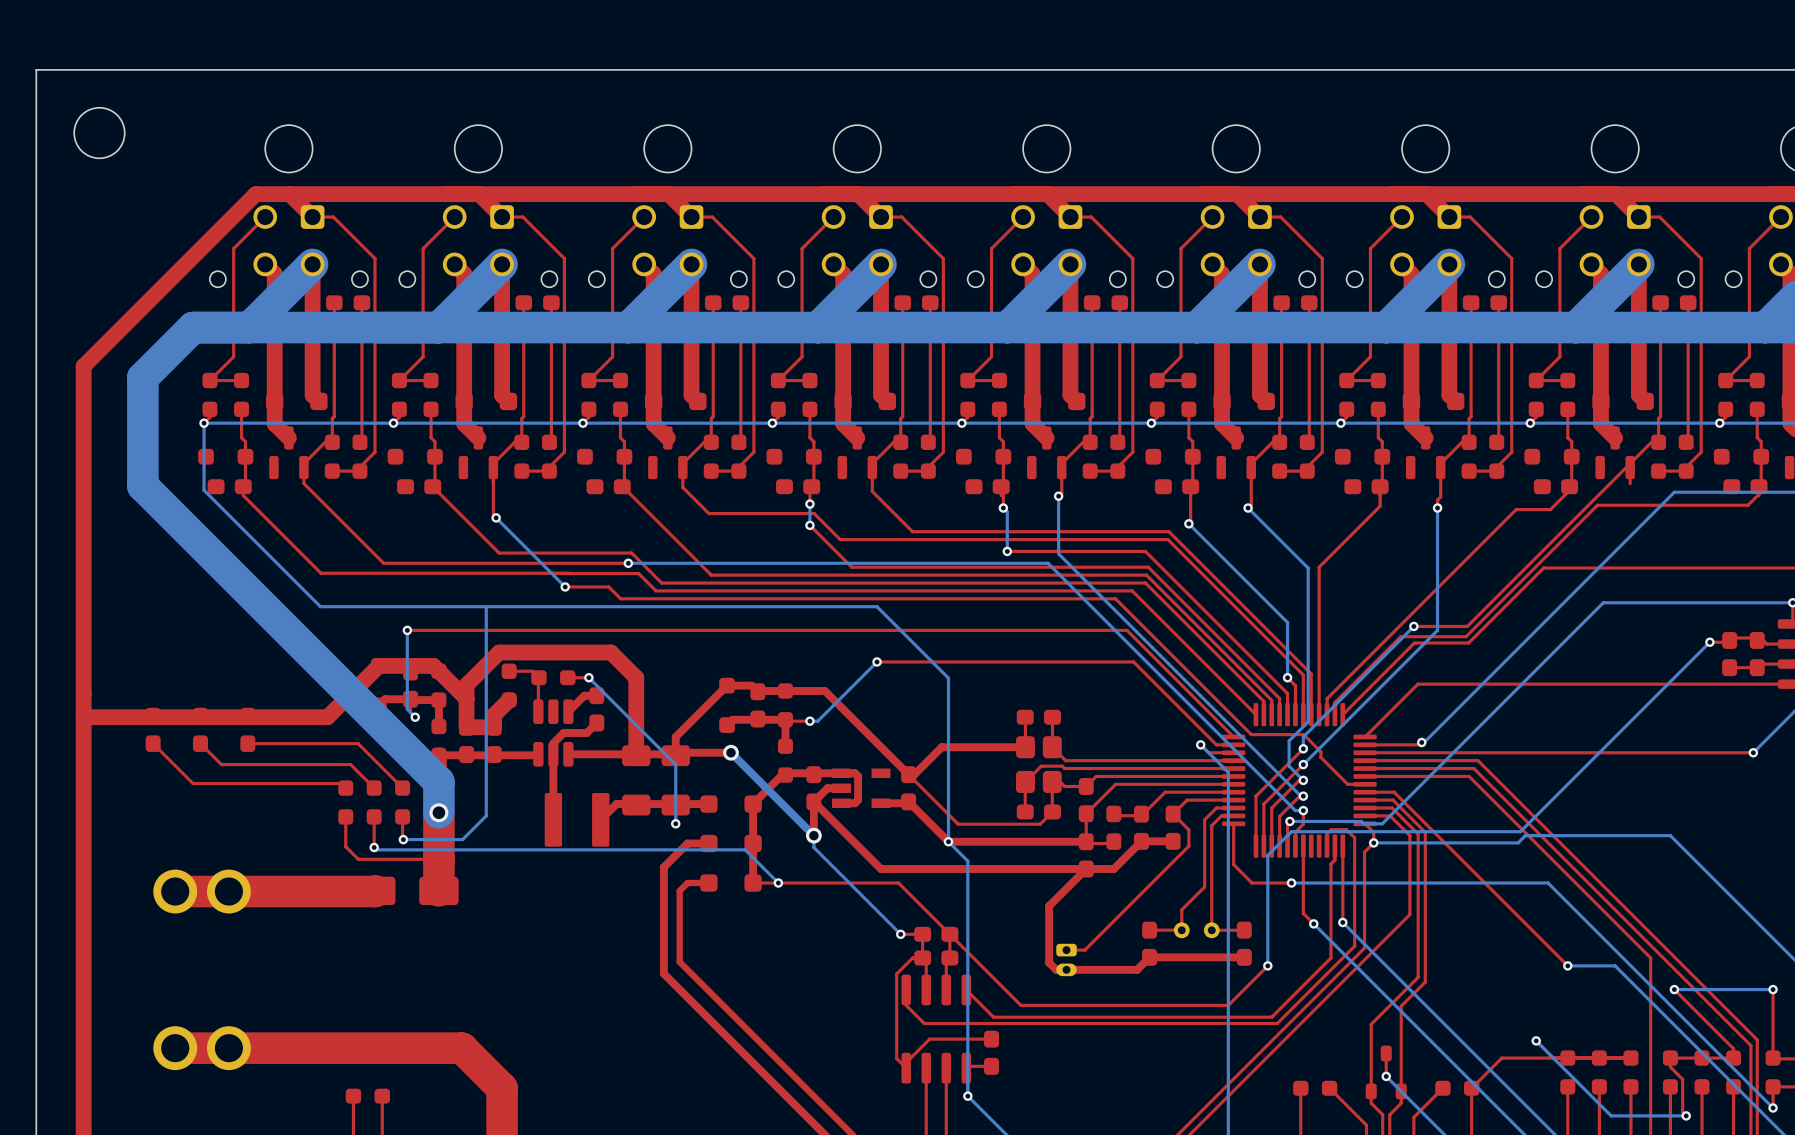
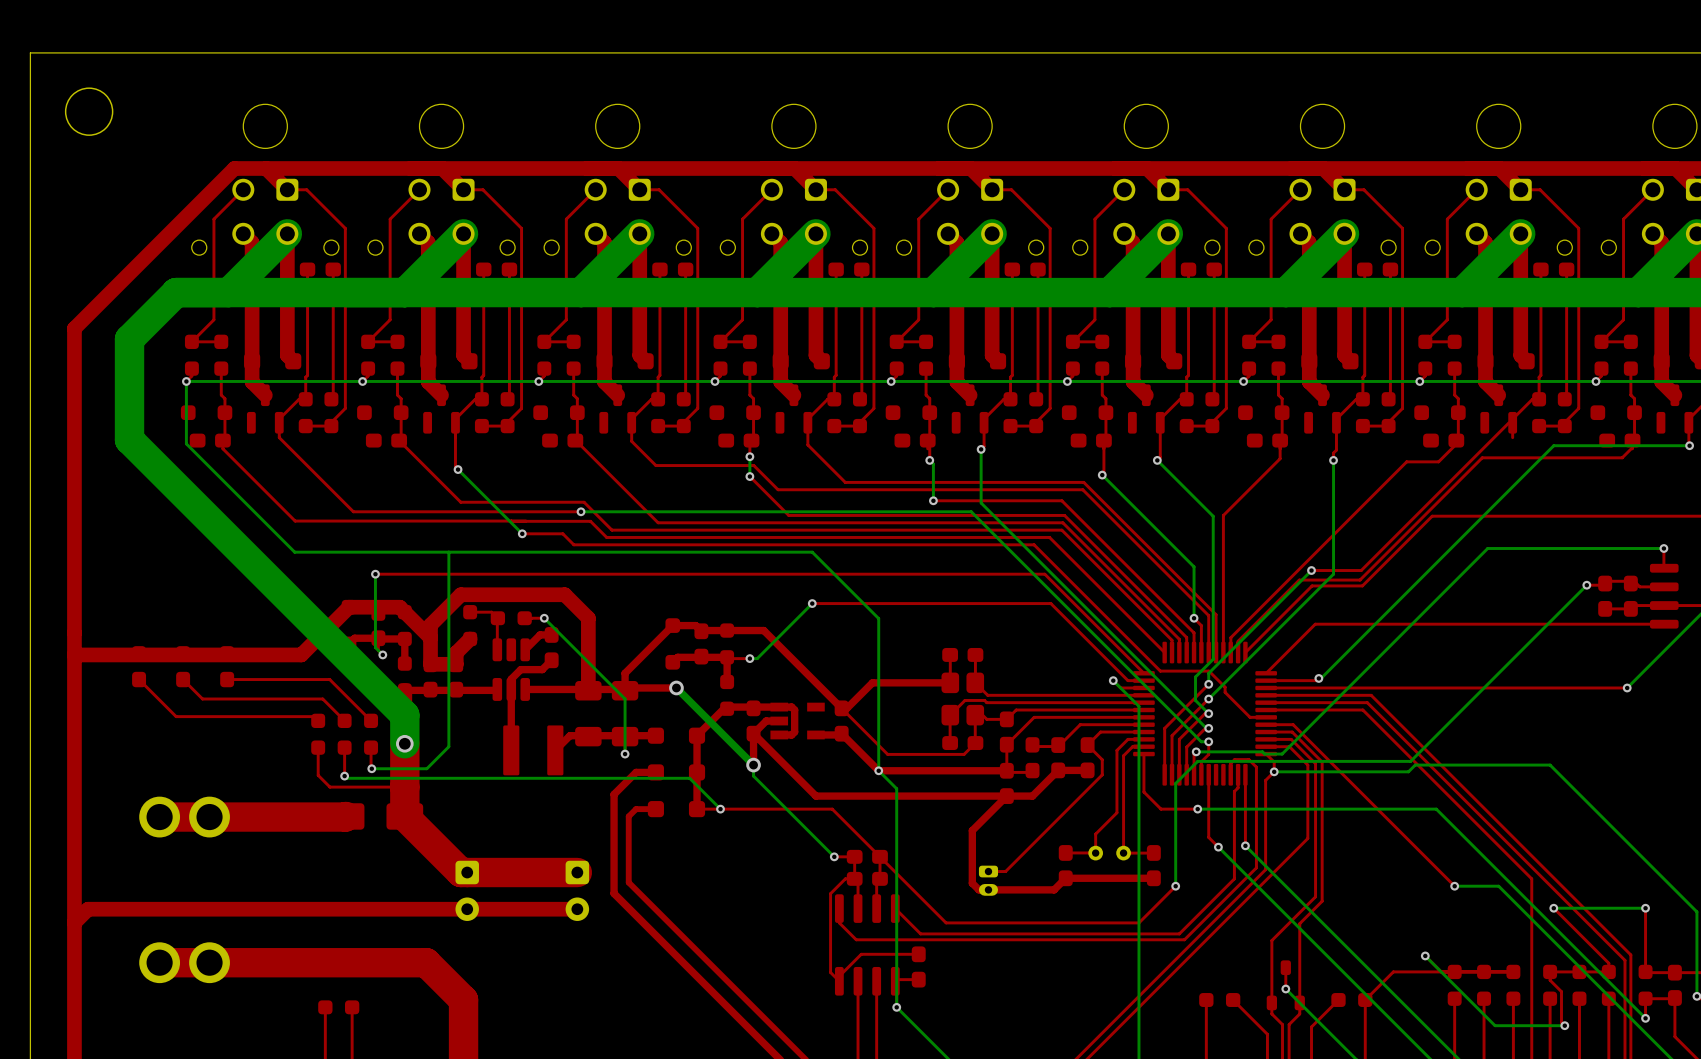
top track: none -> (404, 816) (460, 872) (577, 872)
part: none -> (467, 890)
part: none -> (577, 890)
top track: none -> (577, 909) (88, 909) (74, 922)

